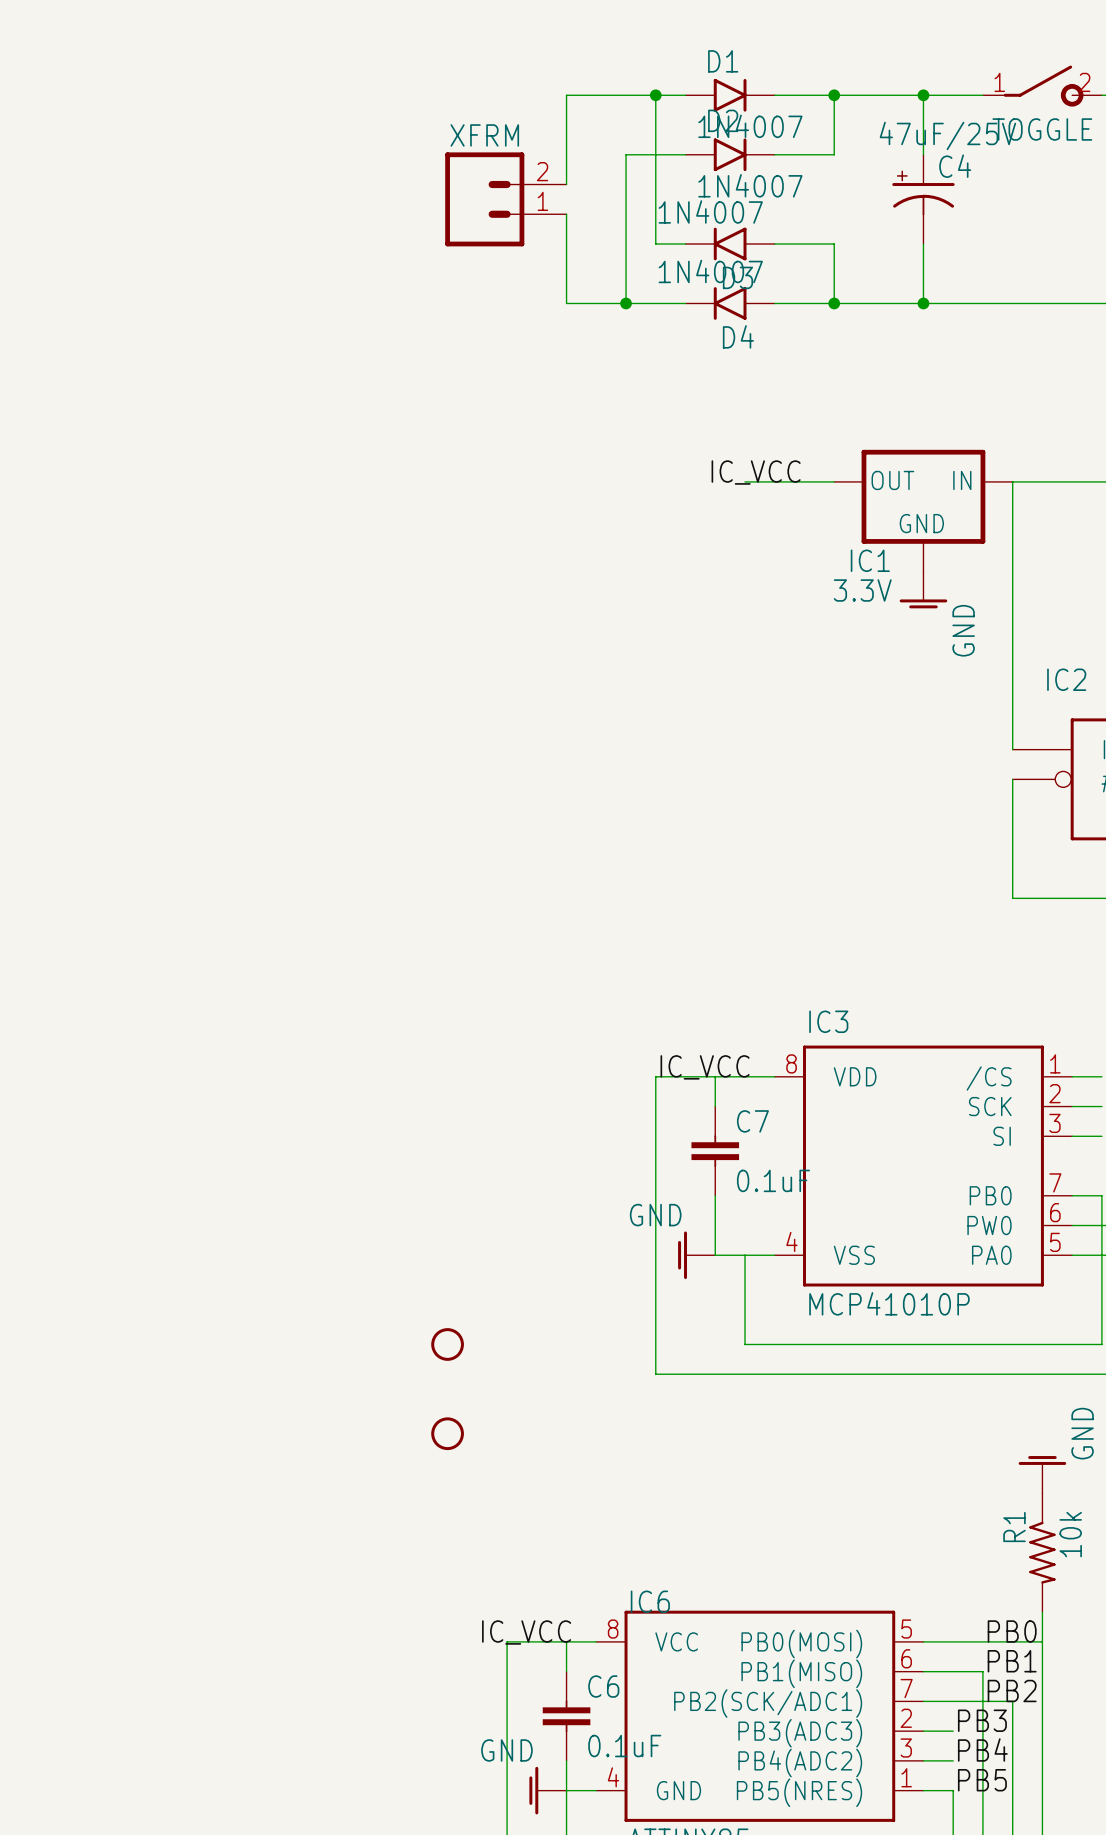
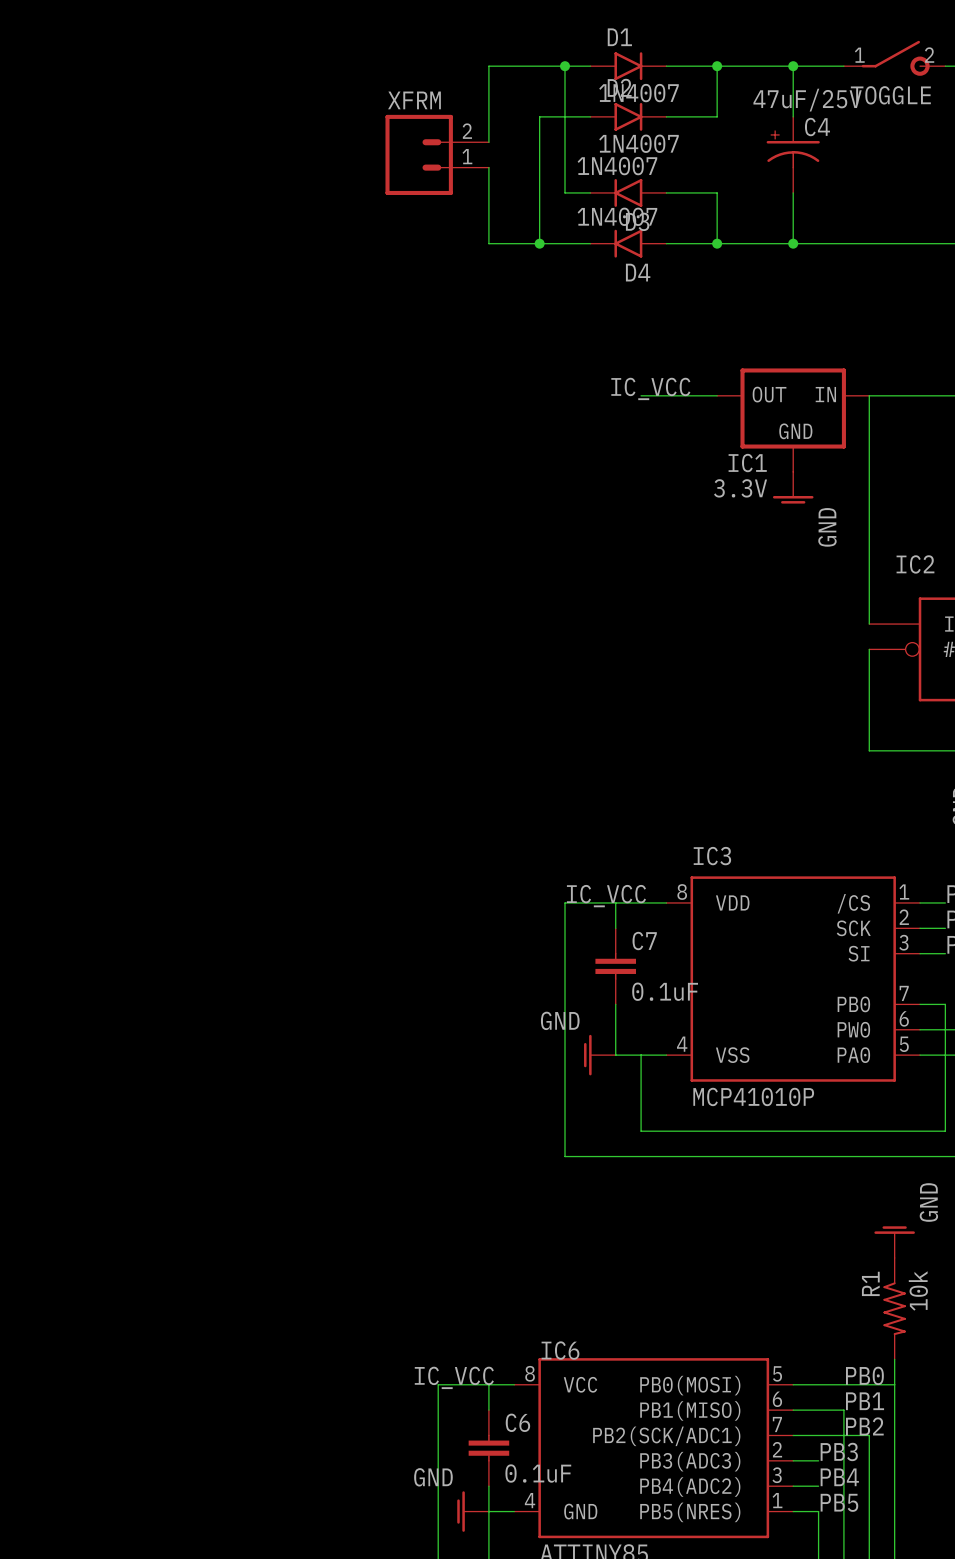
part: (447, 1344) -> none
part: (447, 1433) -> none

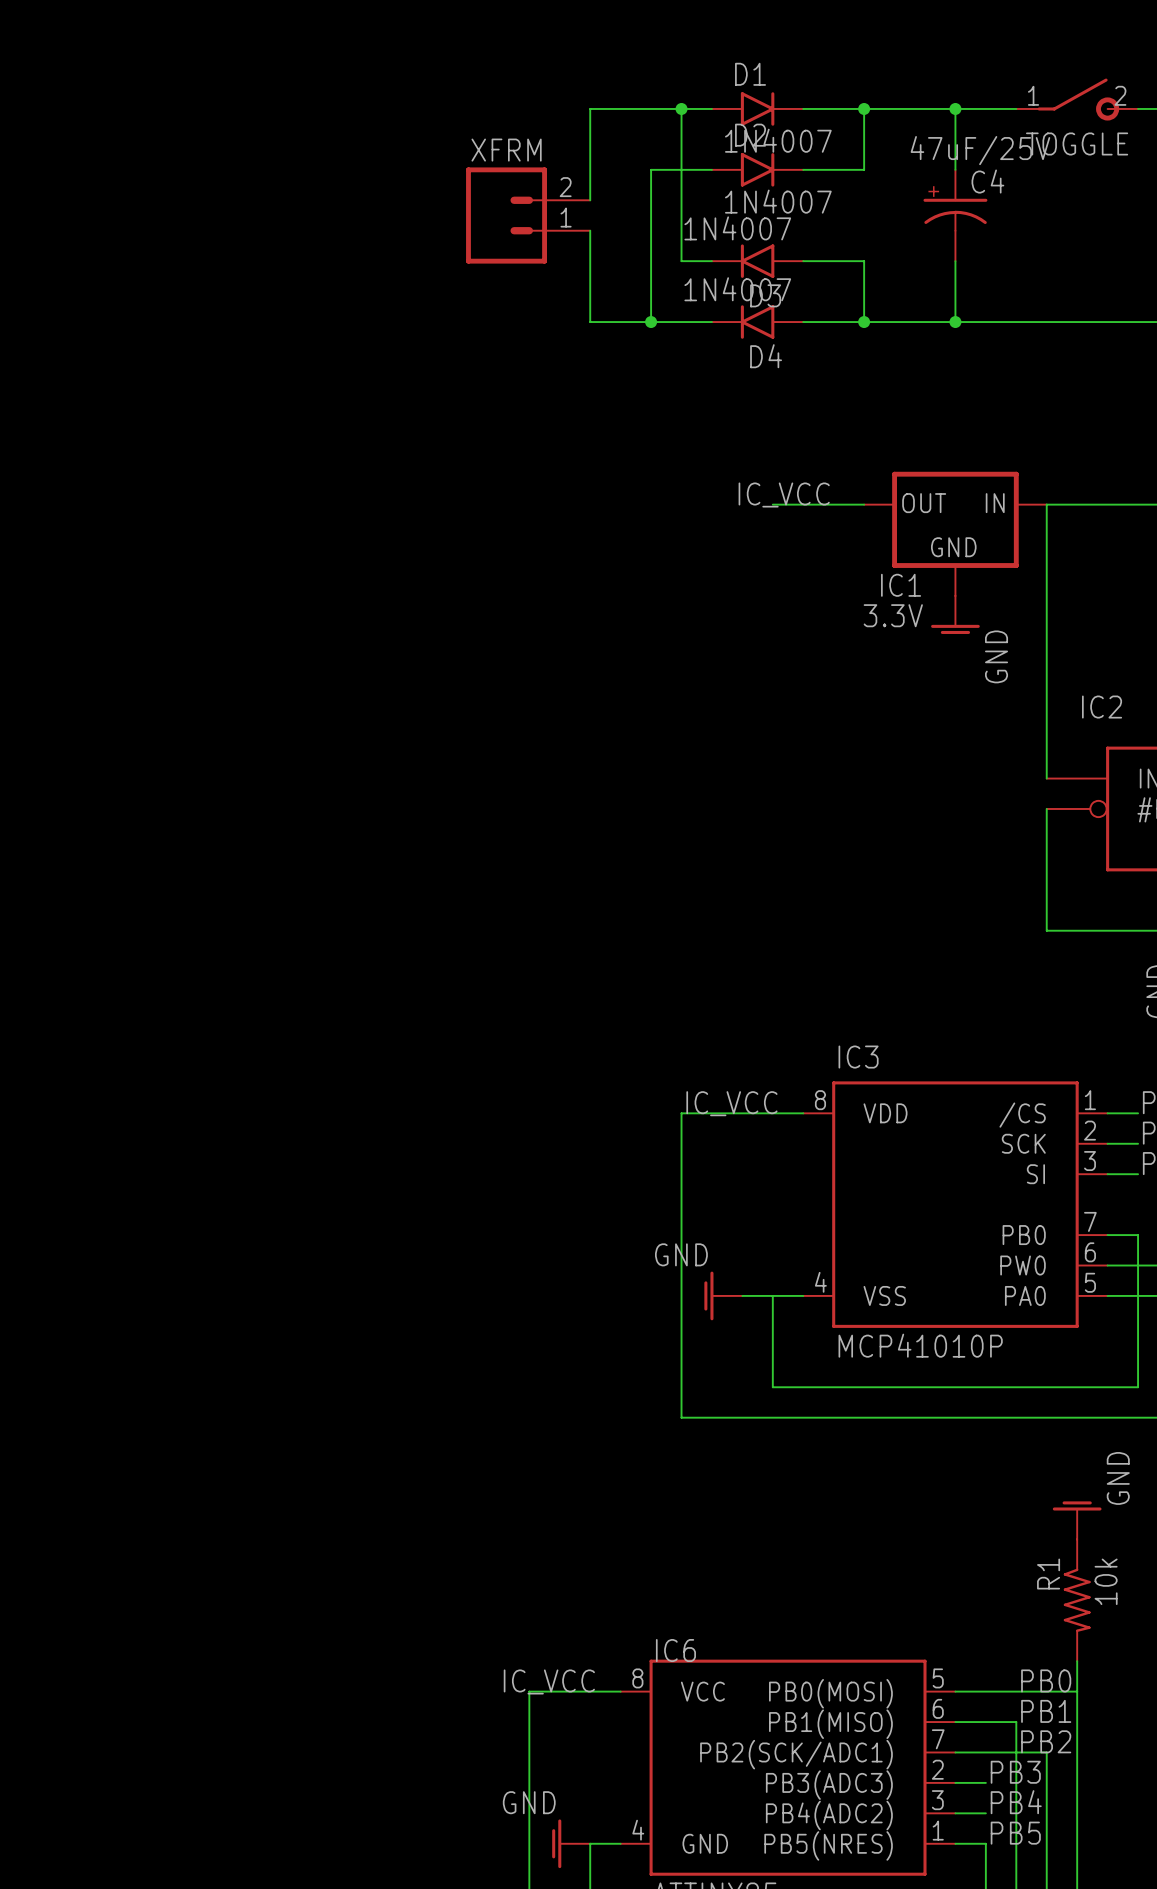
wire: (615, 902) (615, 928) -> none
C7: 0.1uF (615, 966) -> none
wire: (615, 1004) (615, 1055) -> none
wire: (488, 1384) (488, 1410) -> none
C6: 0.1uF (488, 1448) -> none
wire: (488, 1486) (488, 1511) -> none

